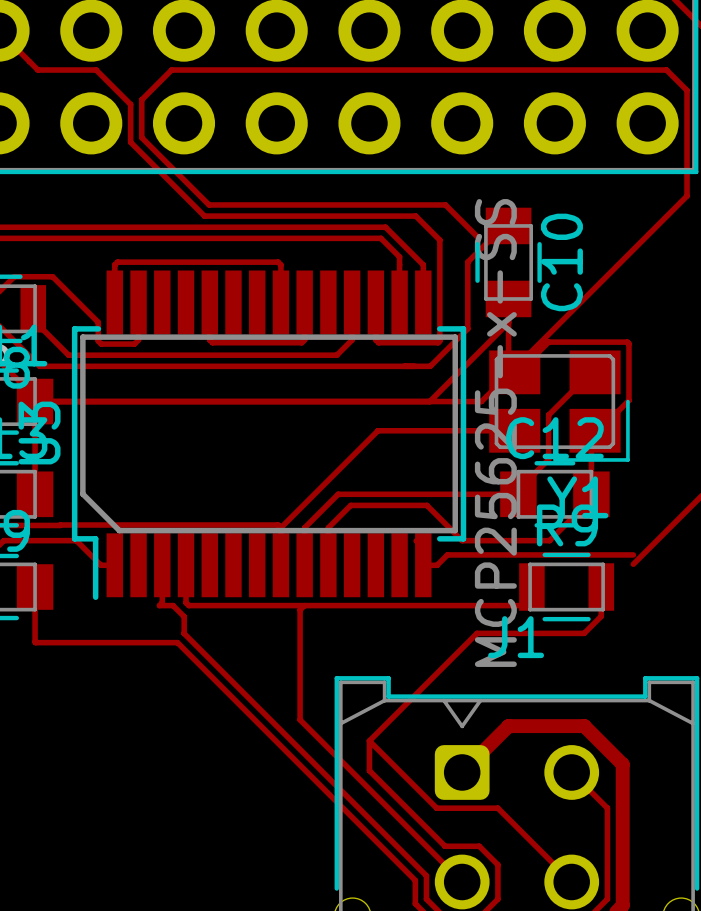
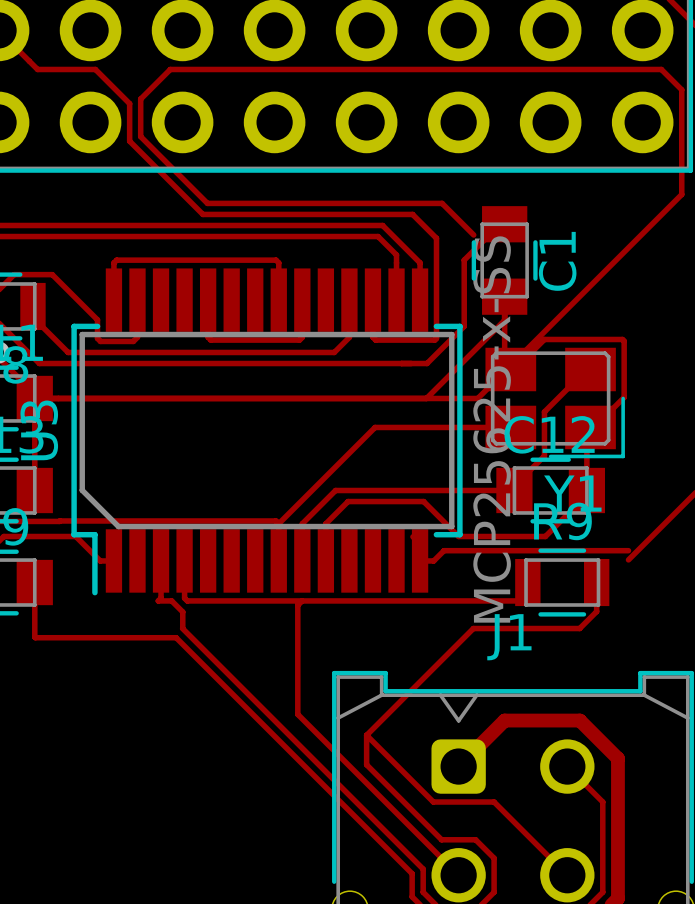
C10 name: C10 (561, 262) -> C1 (557, 261)

